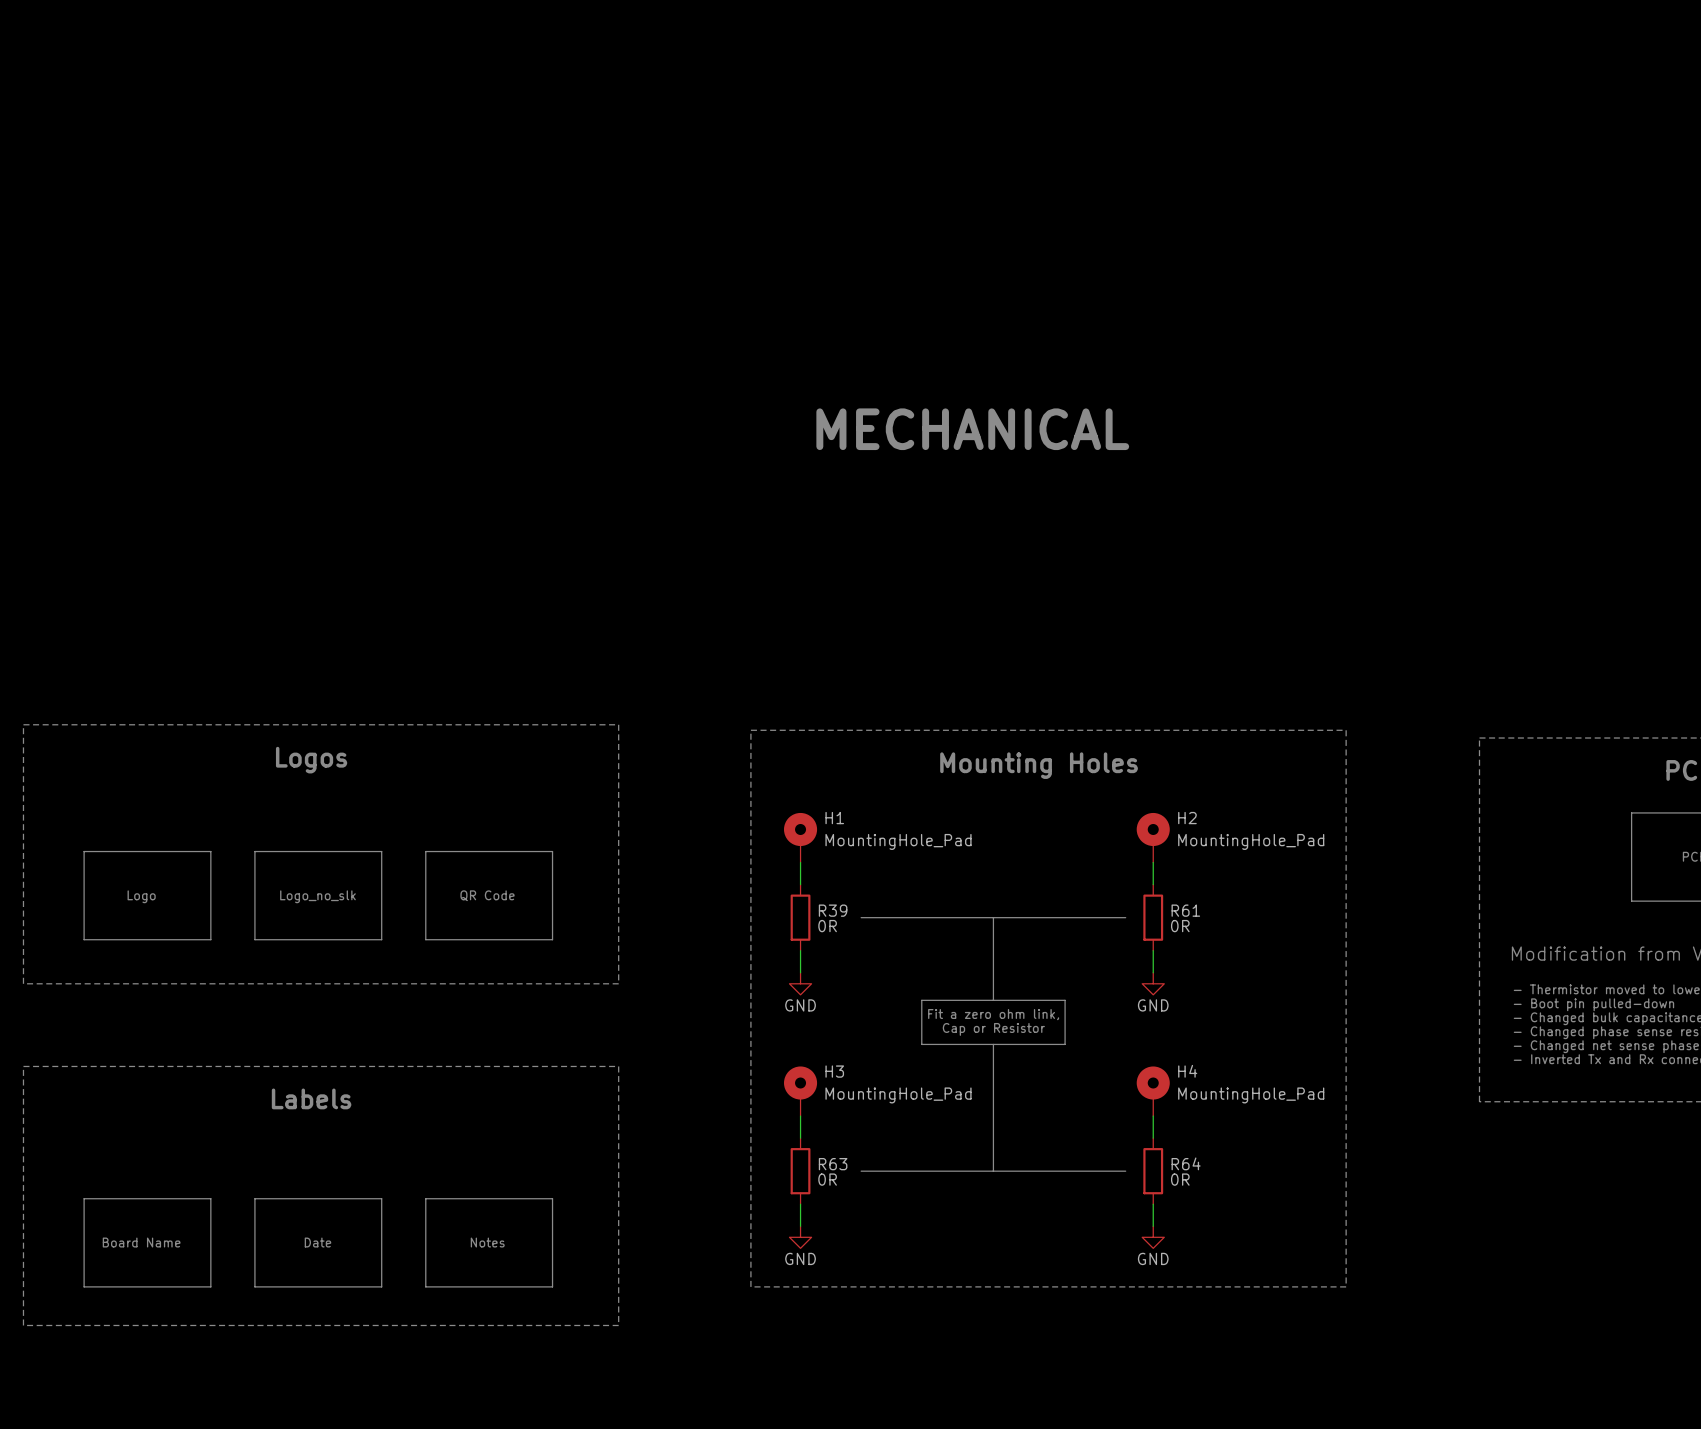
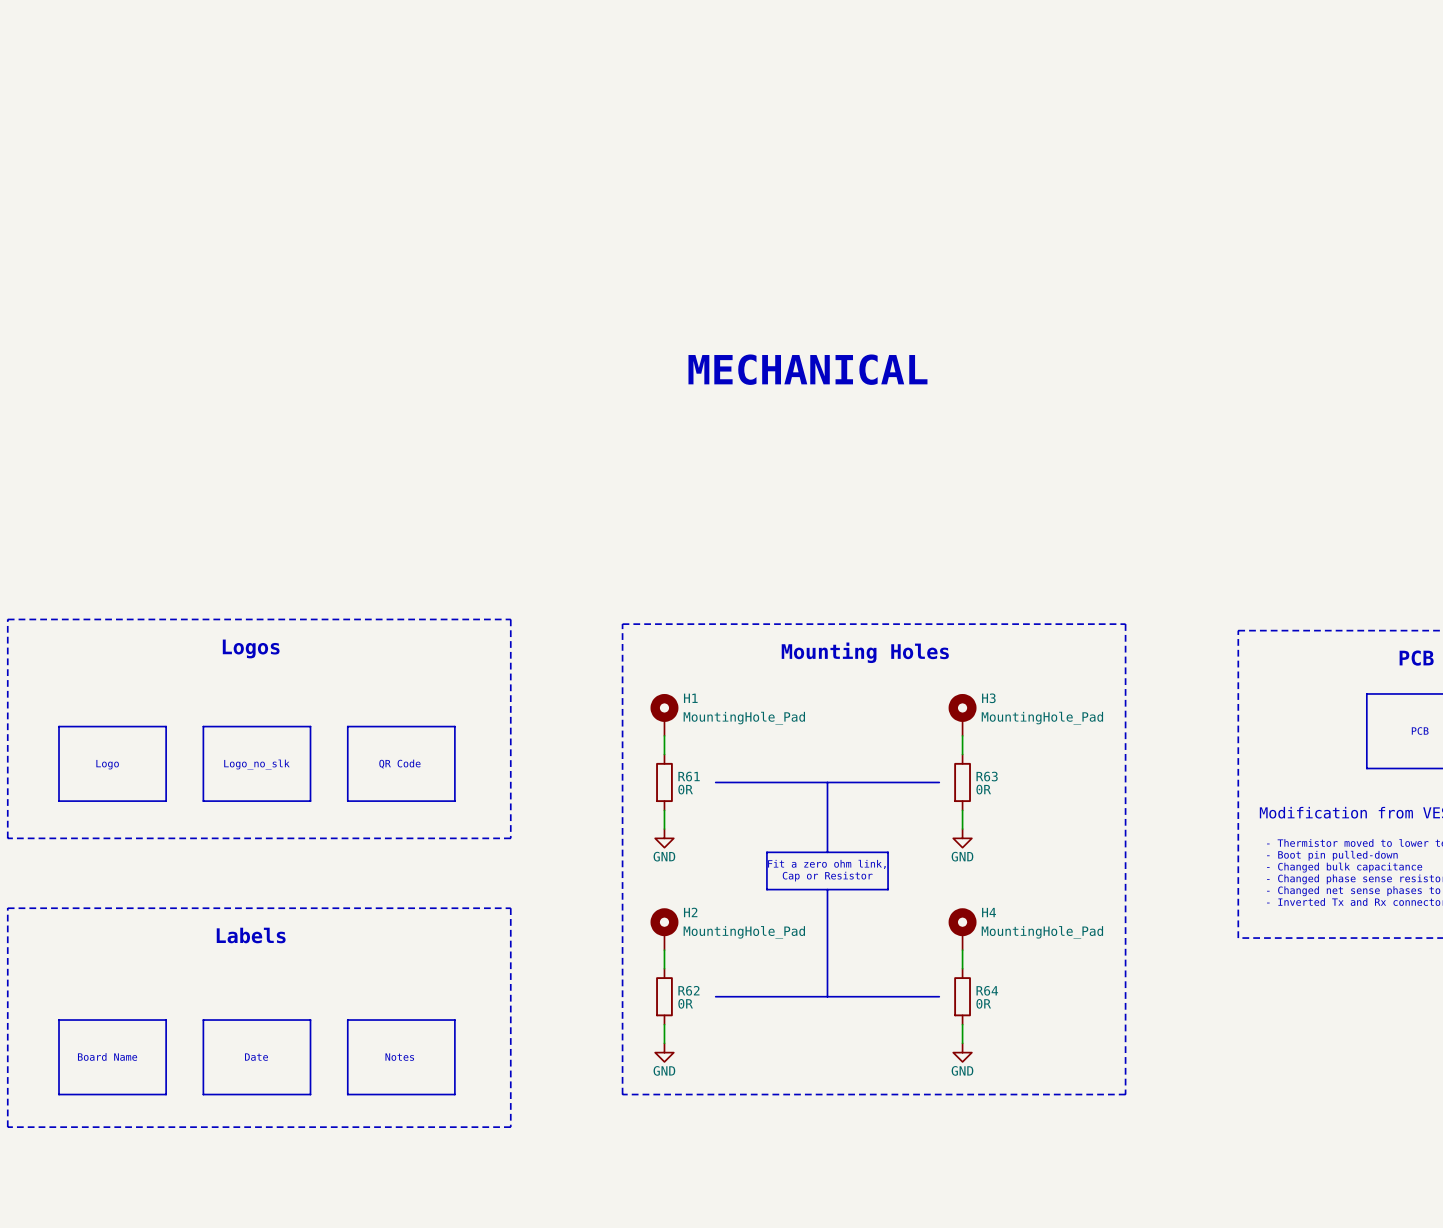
H2 name: H2 (1187, 818) -> H3 (988, 698)
R39 name: R39 (833, 910) -> R61 (689, 776)
R61 name: R61 (1185, 910) -> R63 (987, 776)
H3 name: H3 (834, 1071) -> H2 (690, 912)
R63 name: R63 (833, 1164) -> R62 (688, 990)

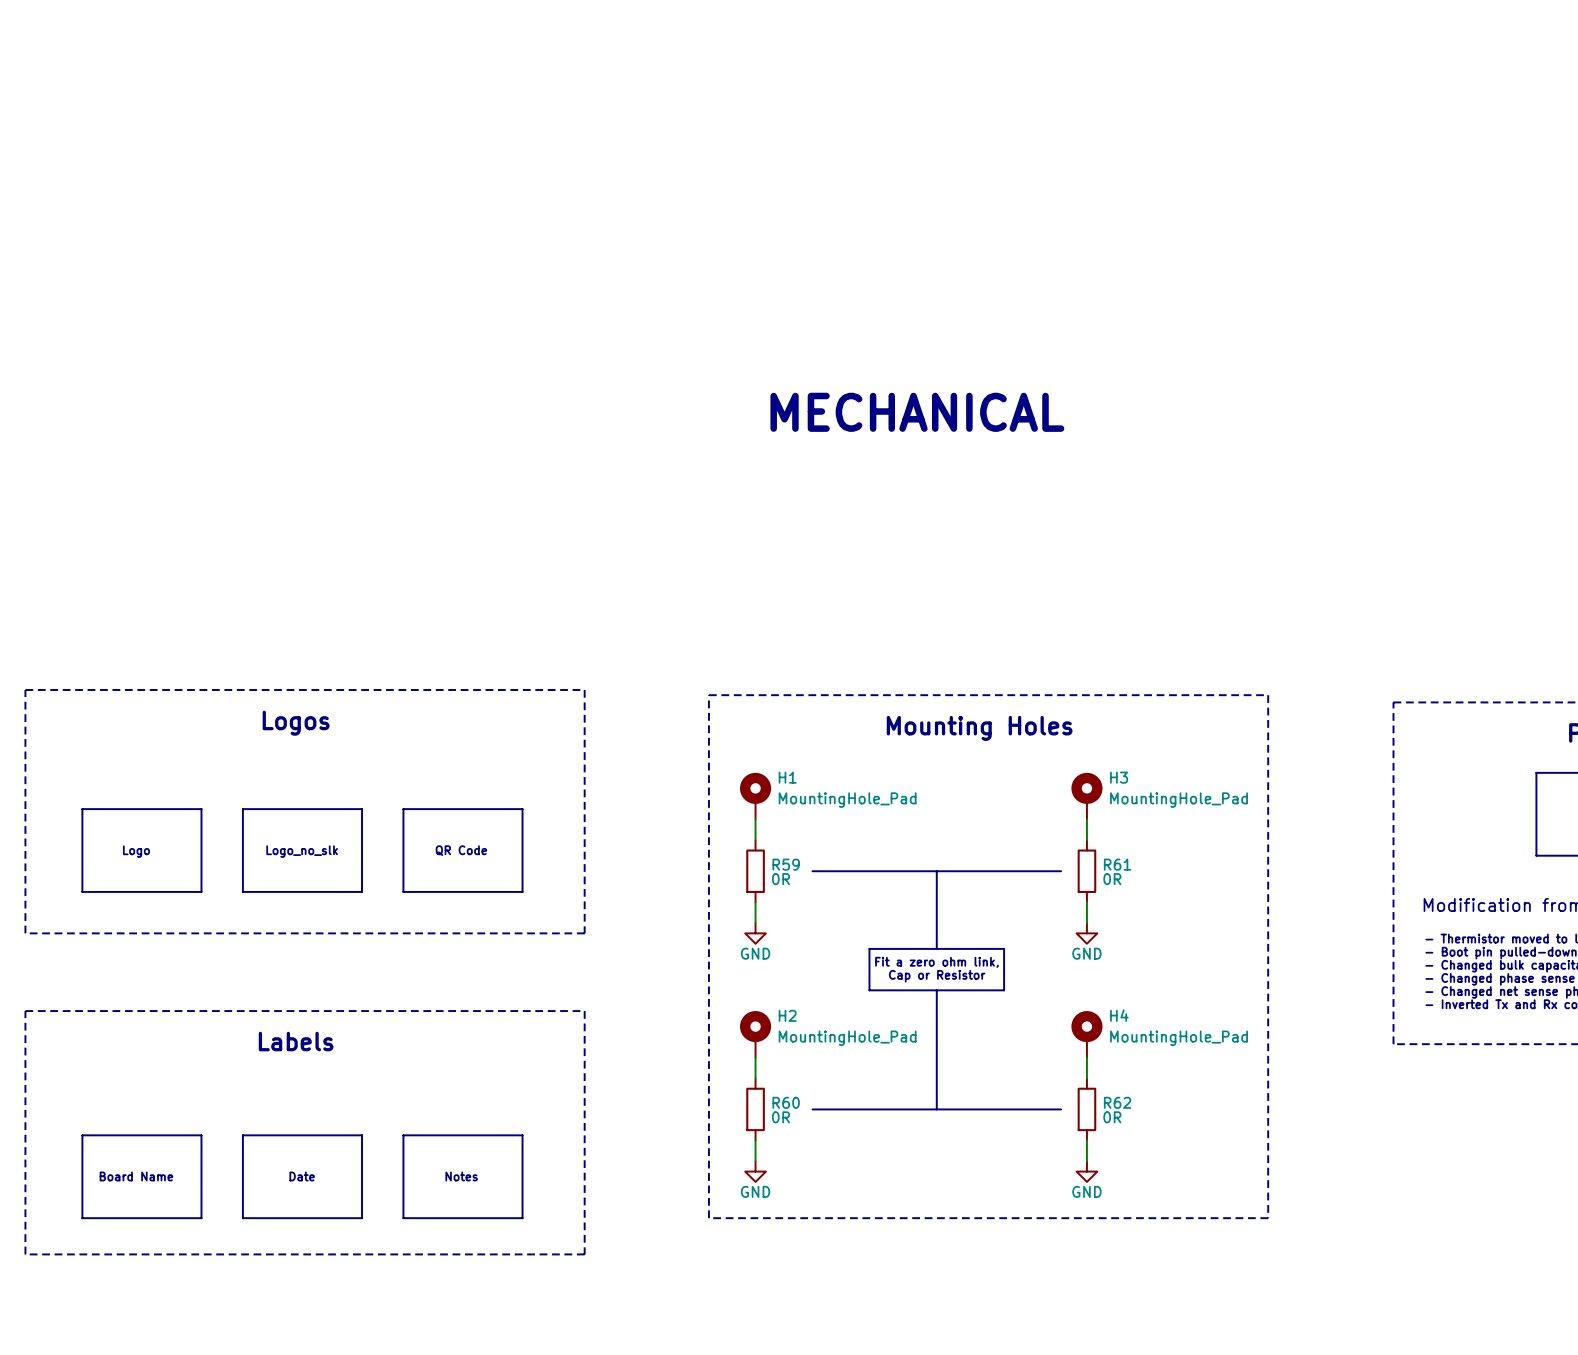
R61 name: R61 (689, 776) -> R59 (786, 864)
R63 name: R63 (987, 776) -> R61 (1117, 864)
R62 name: R62 (688, 990) -> R60 (786, 1102)
R64 name: R64 (987, 990) -> R62 (1117, 1102)

